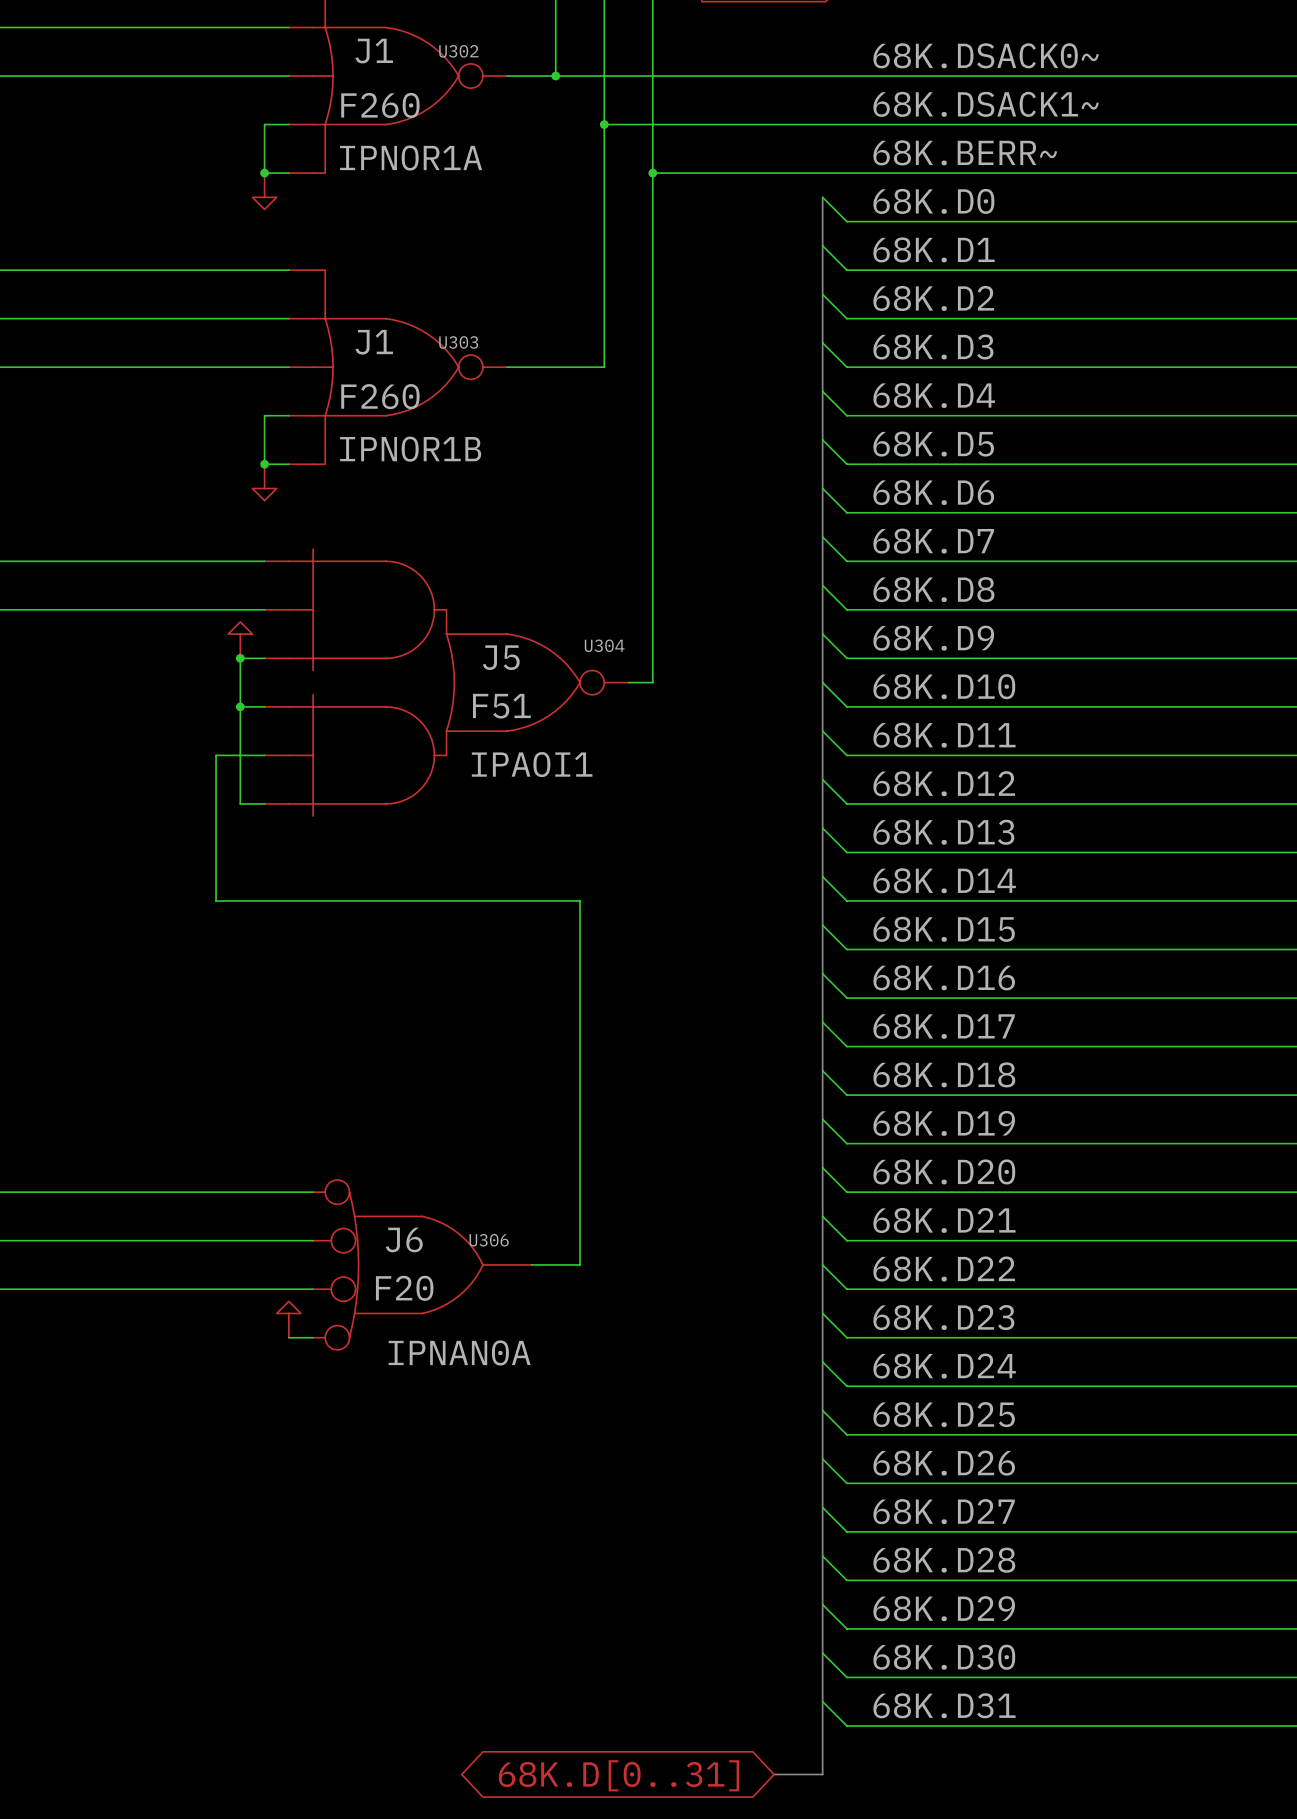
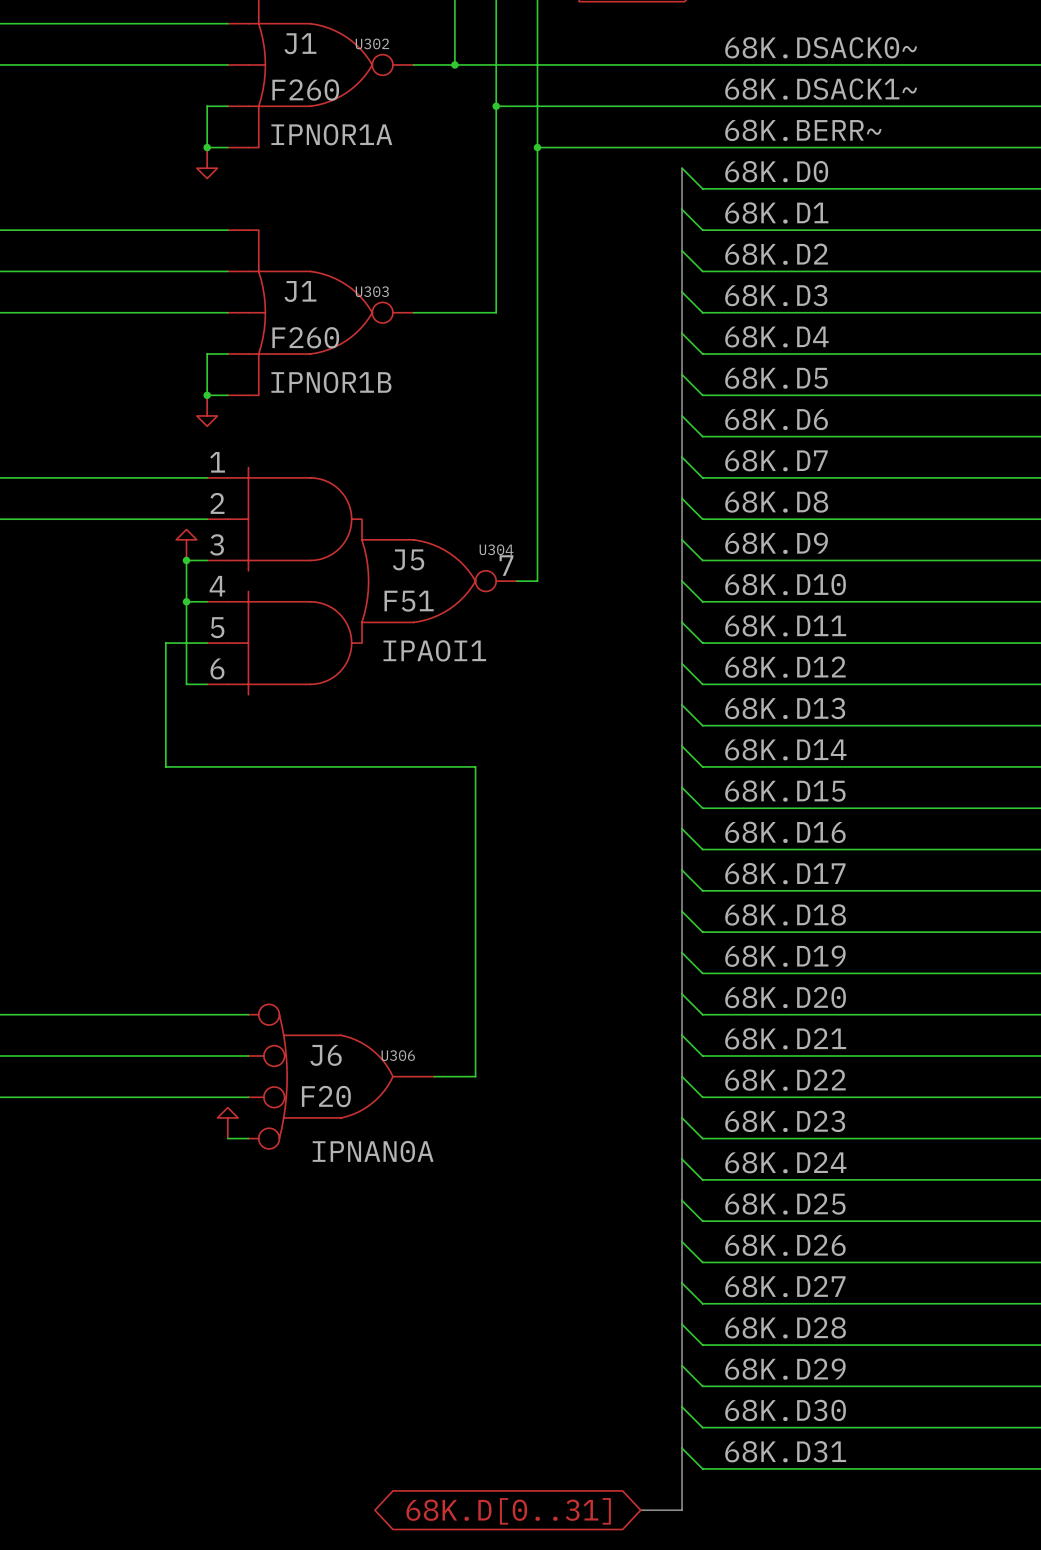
U304 pin number: none -> 1 (217, 462)
U304 pin number: none -> 2 (217, 503)
U304 pin number: none -> 3 (216, 544)
U304 pin number: none -> 7 (506, 565)
U304 pin number: none -> 4 (217, 586)
U304 pin number: none -> 5 (217, 627)
U304 pin number: none -> 6 (217, 668)

